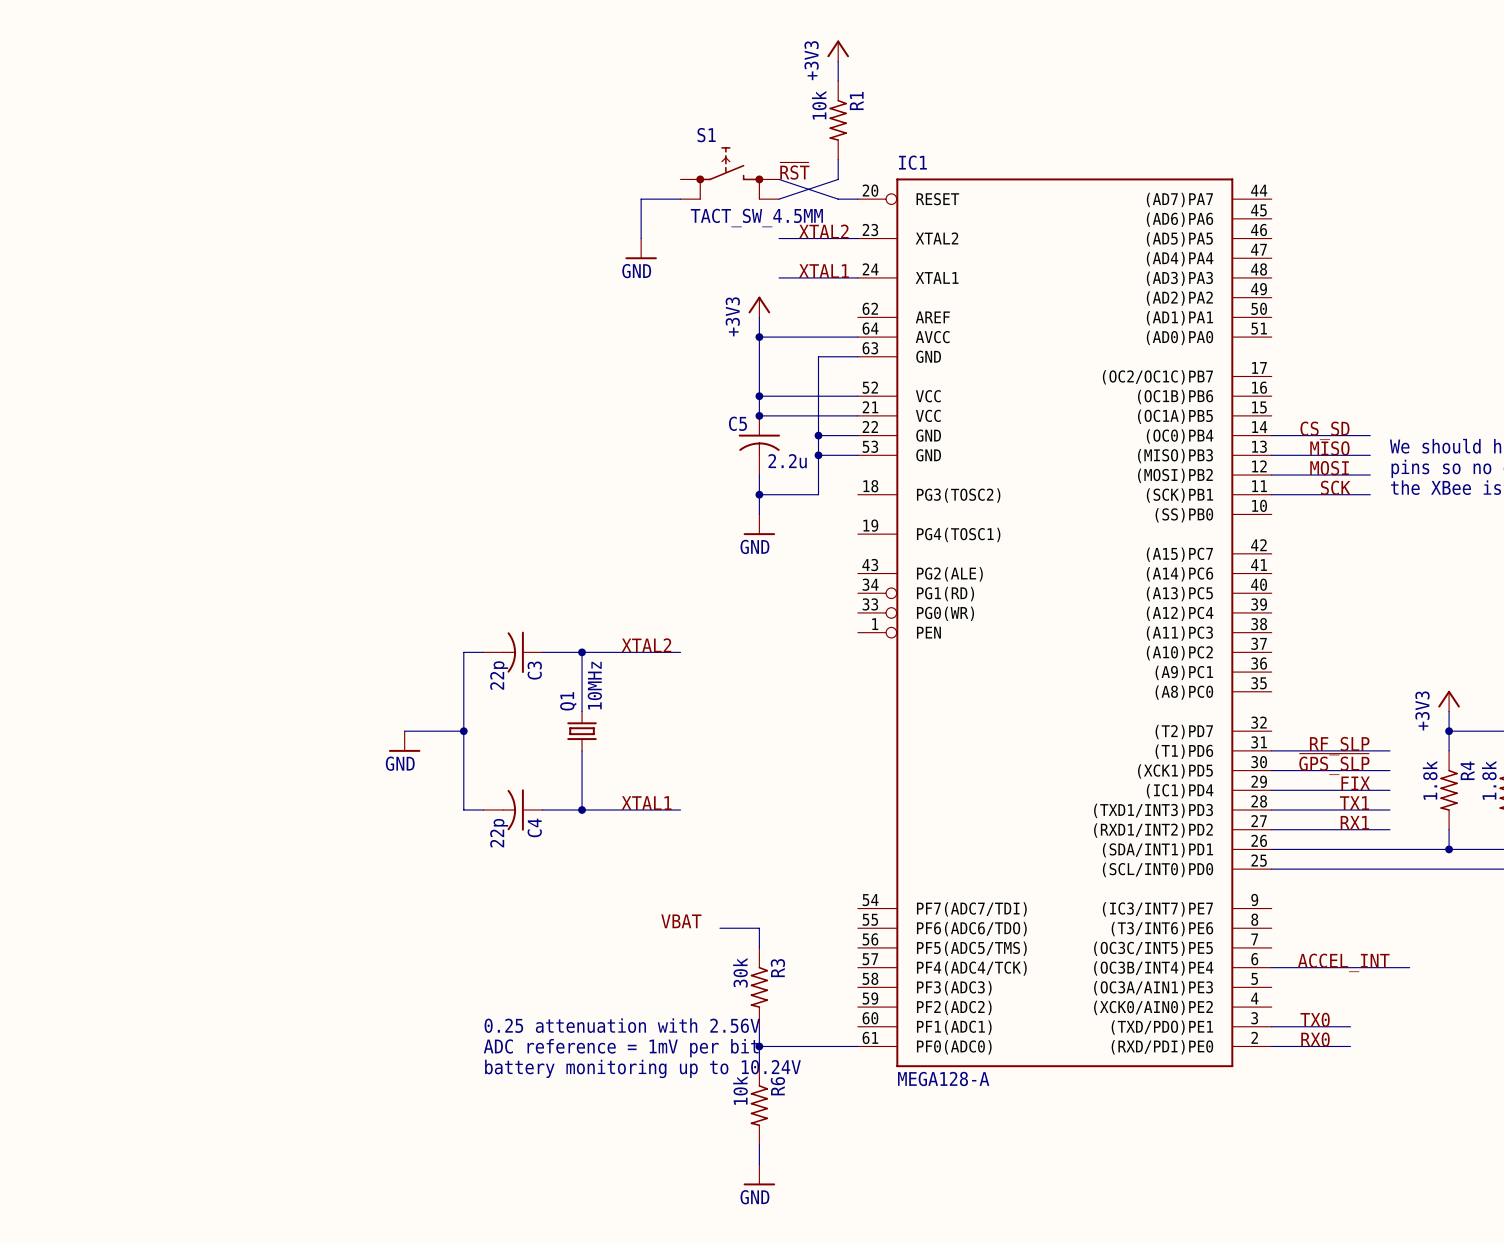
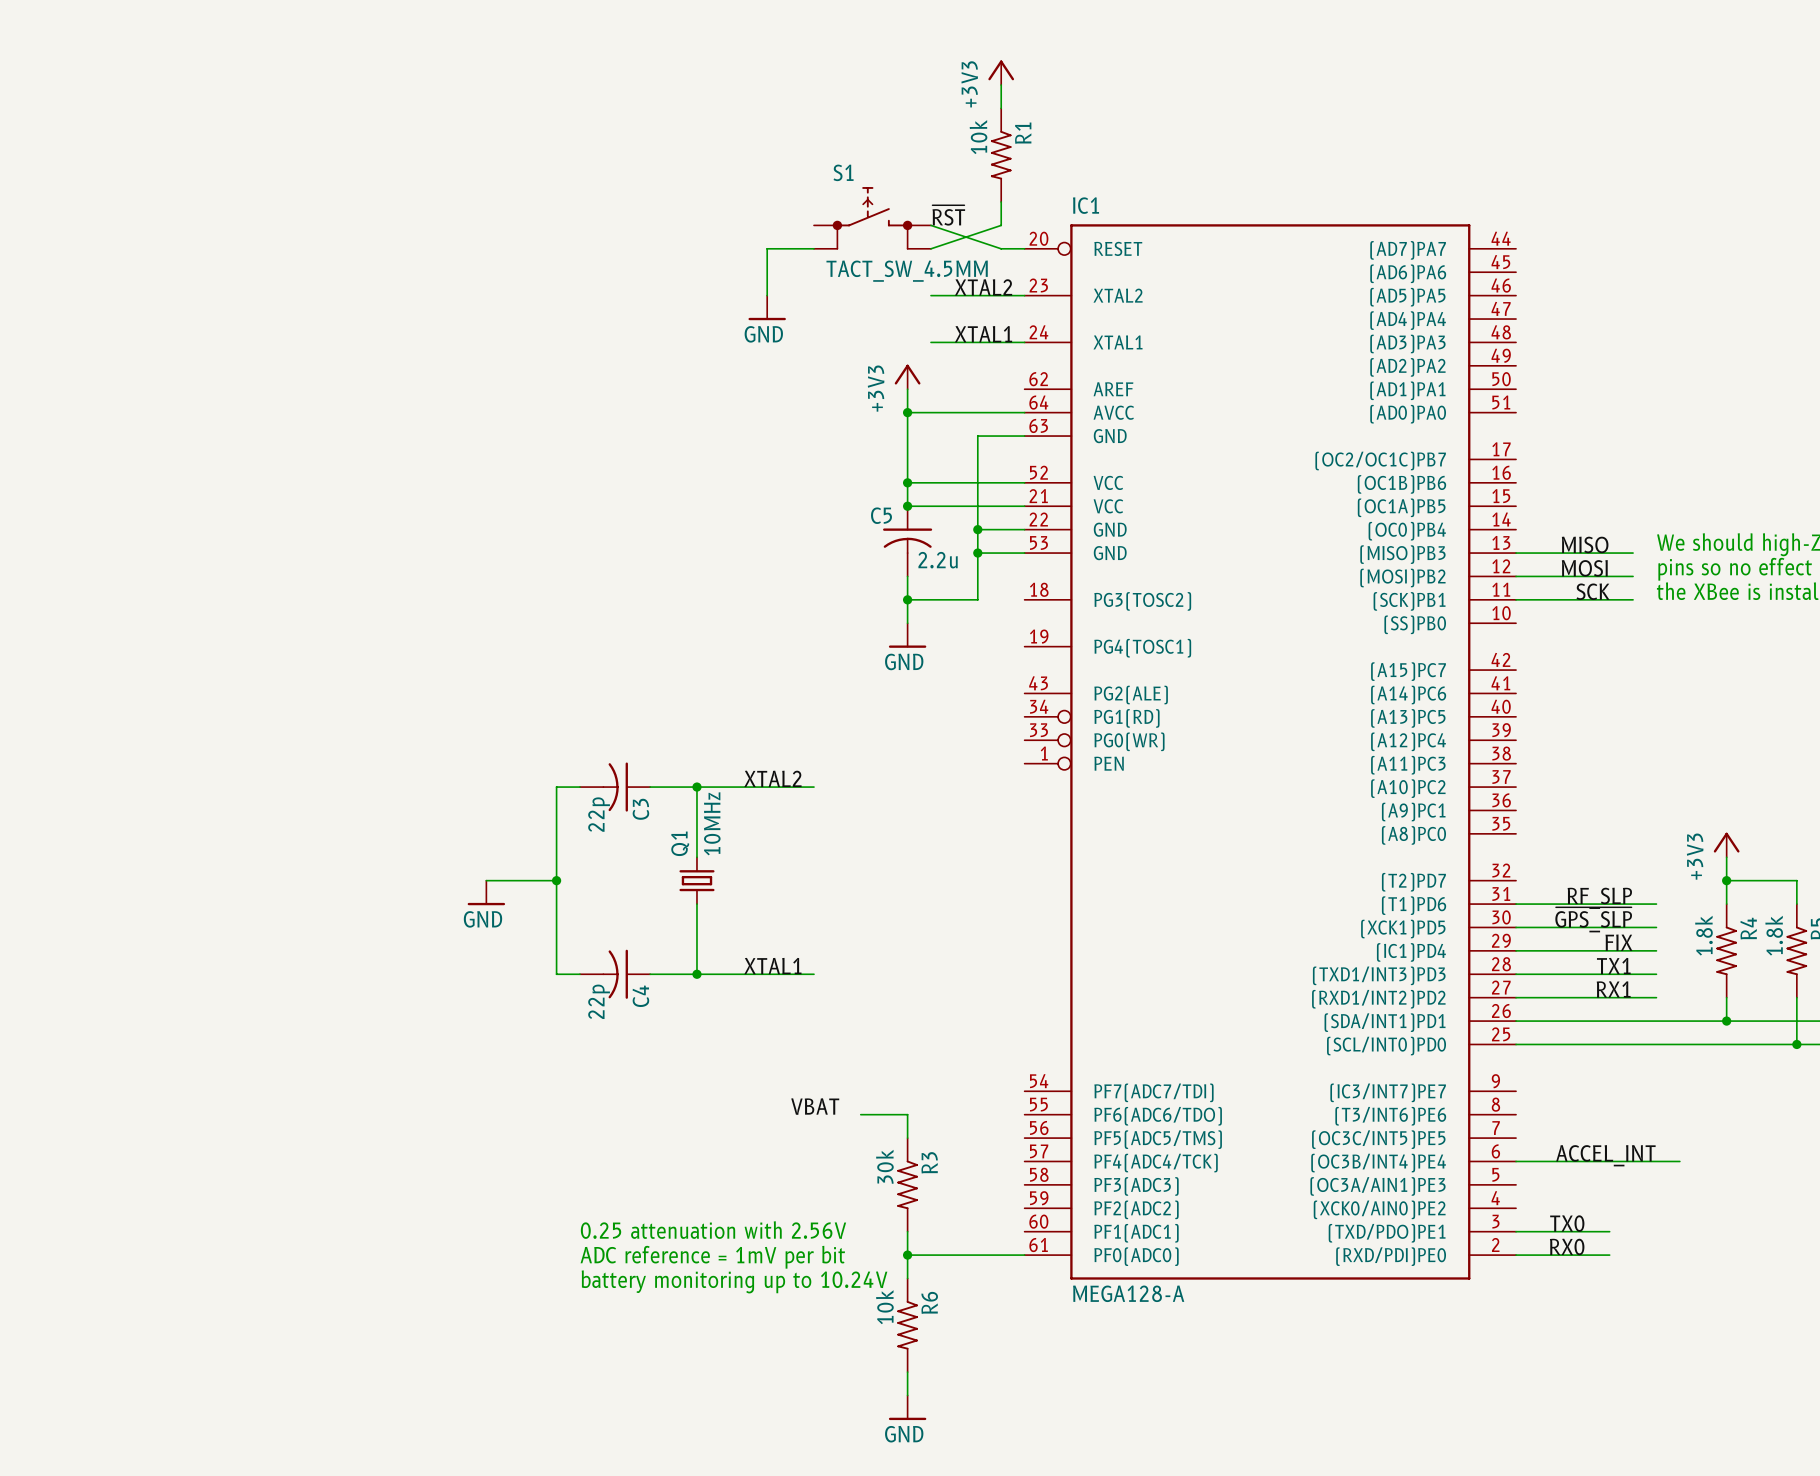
label: CS_SD (1324, 430) -> none
wire: (1271, 435) (1370, 435) -> none

